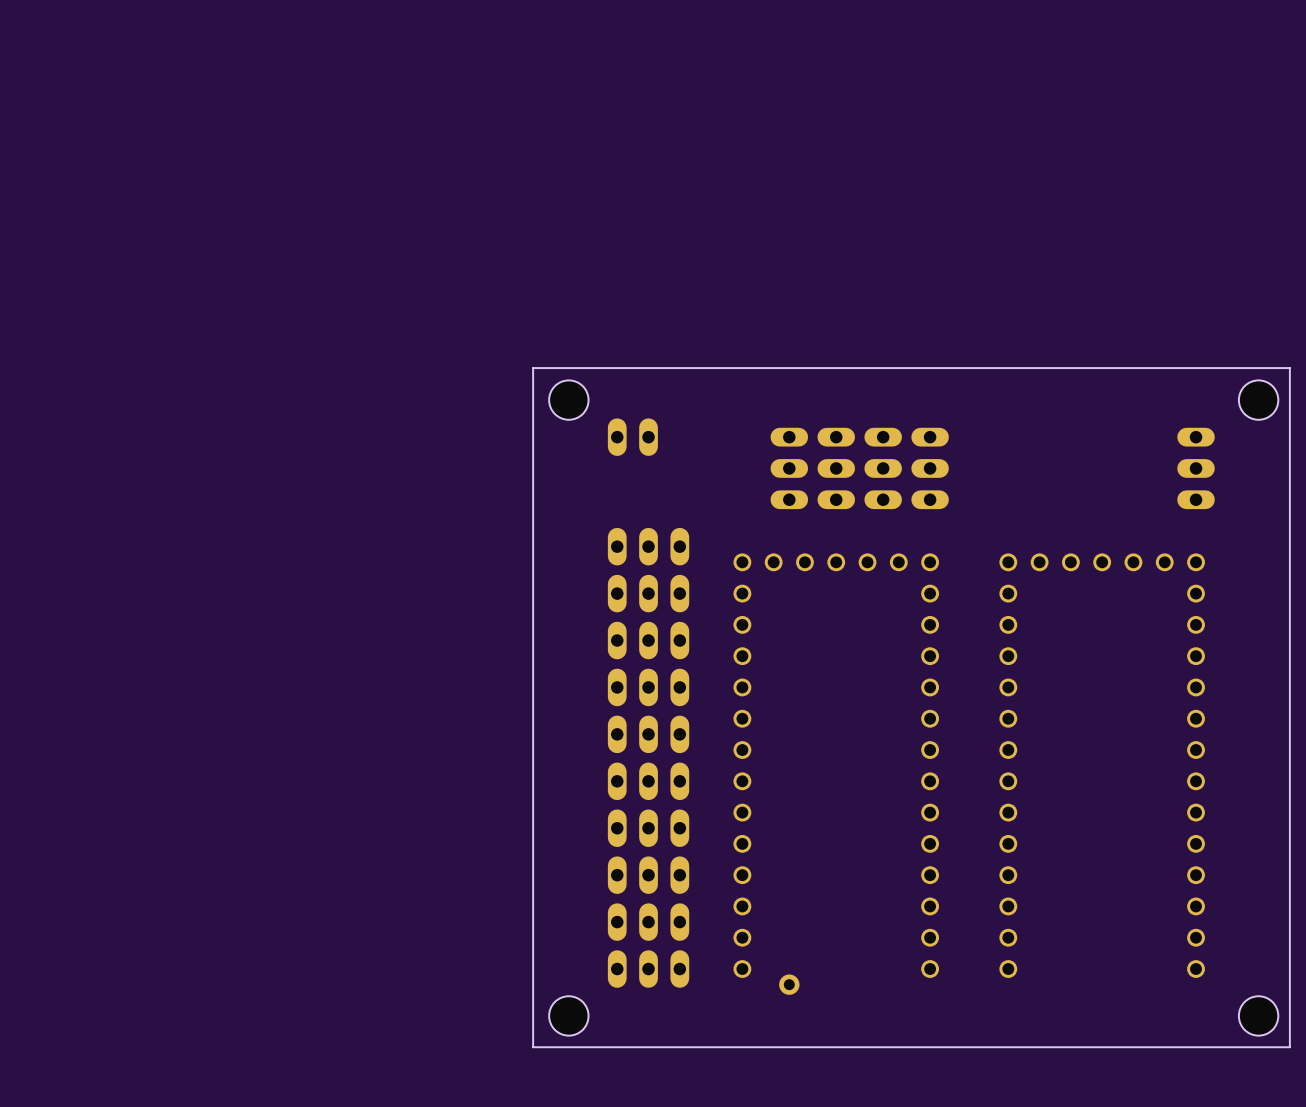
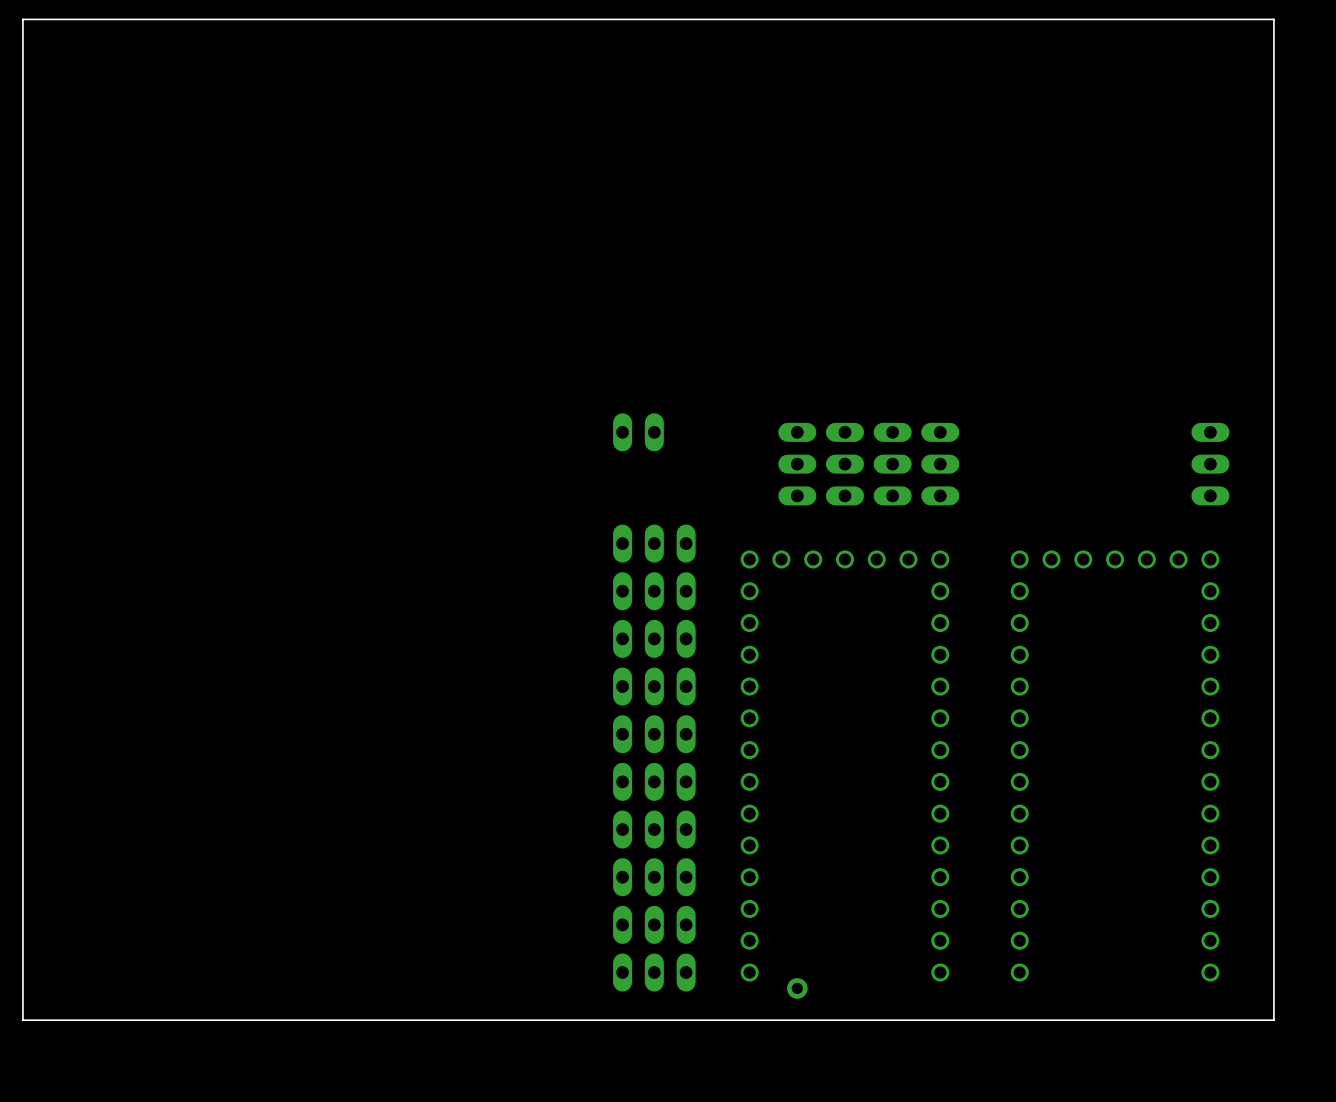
board edge: none -> (1273, 19) (22, 19) (22, 1020) (1273, 1020) (1273, 19)
board edge: (1289, 368) (533, 368) (533, 1047) (1289, 1047) (1289, 368) -> none
hole: (568, 400) -> none
hole: (1258, 400) -> none
hole: (568, 1015) -> none
hole: (1258, 1015) -> none

